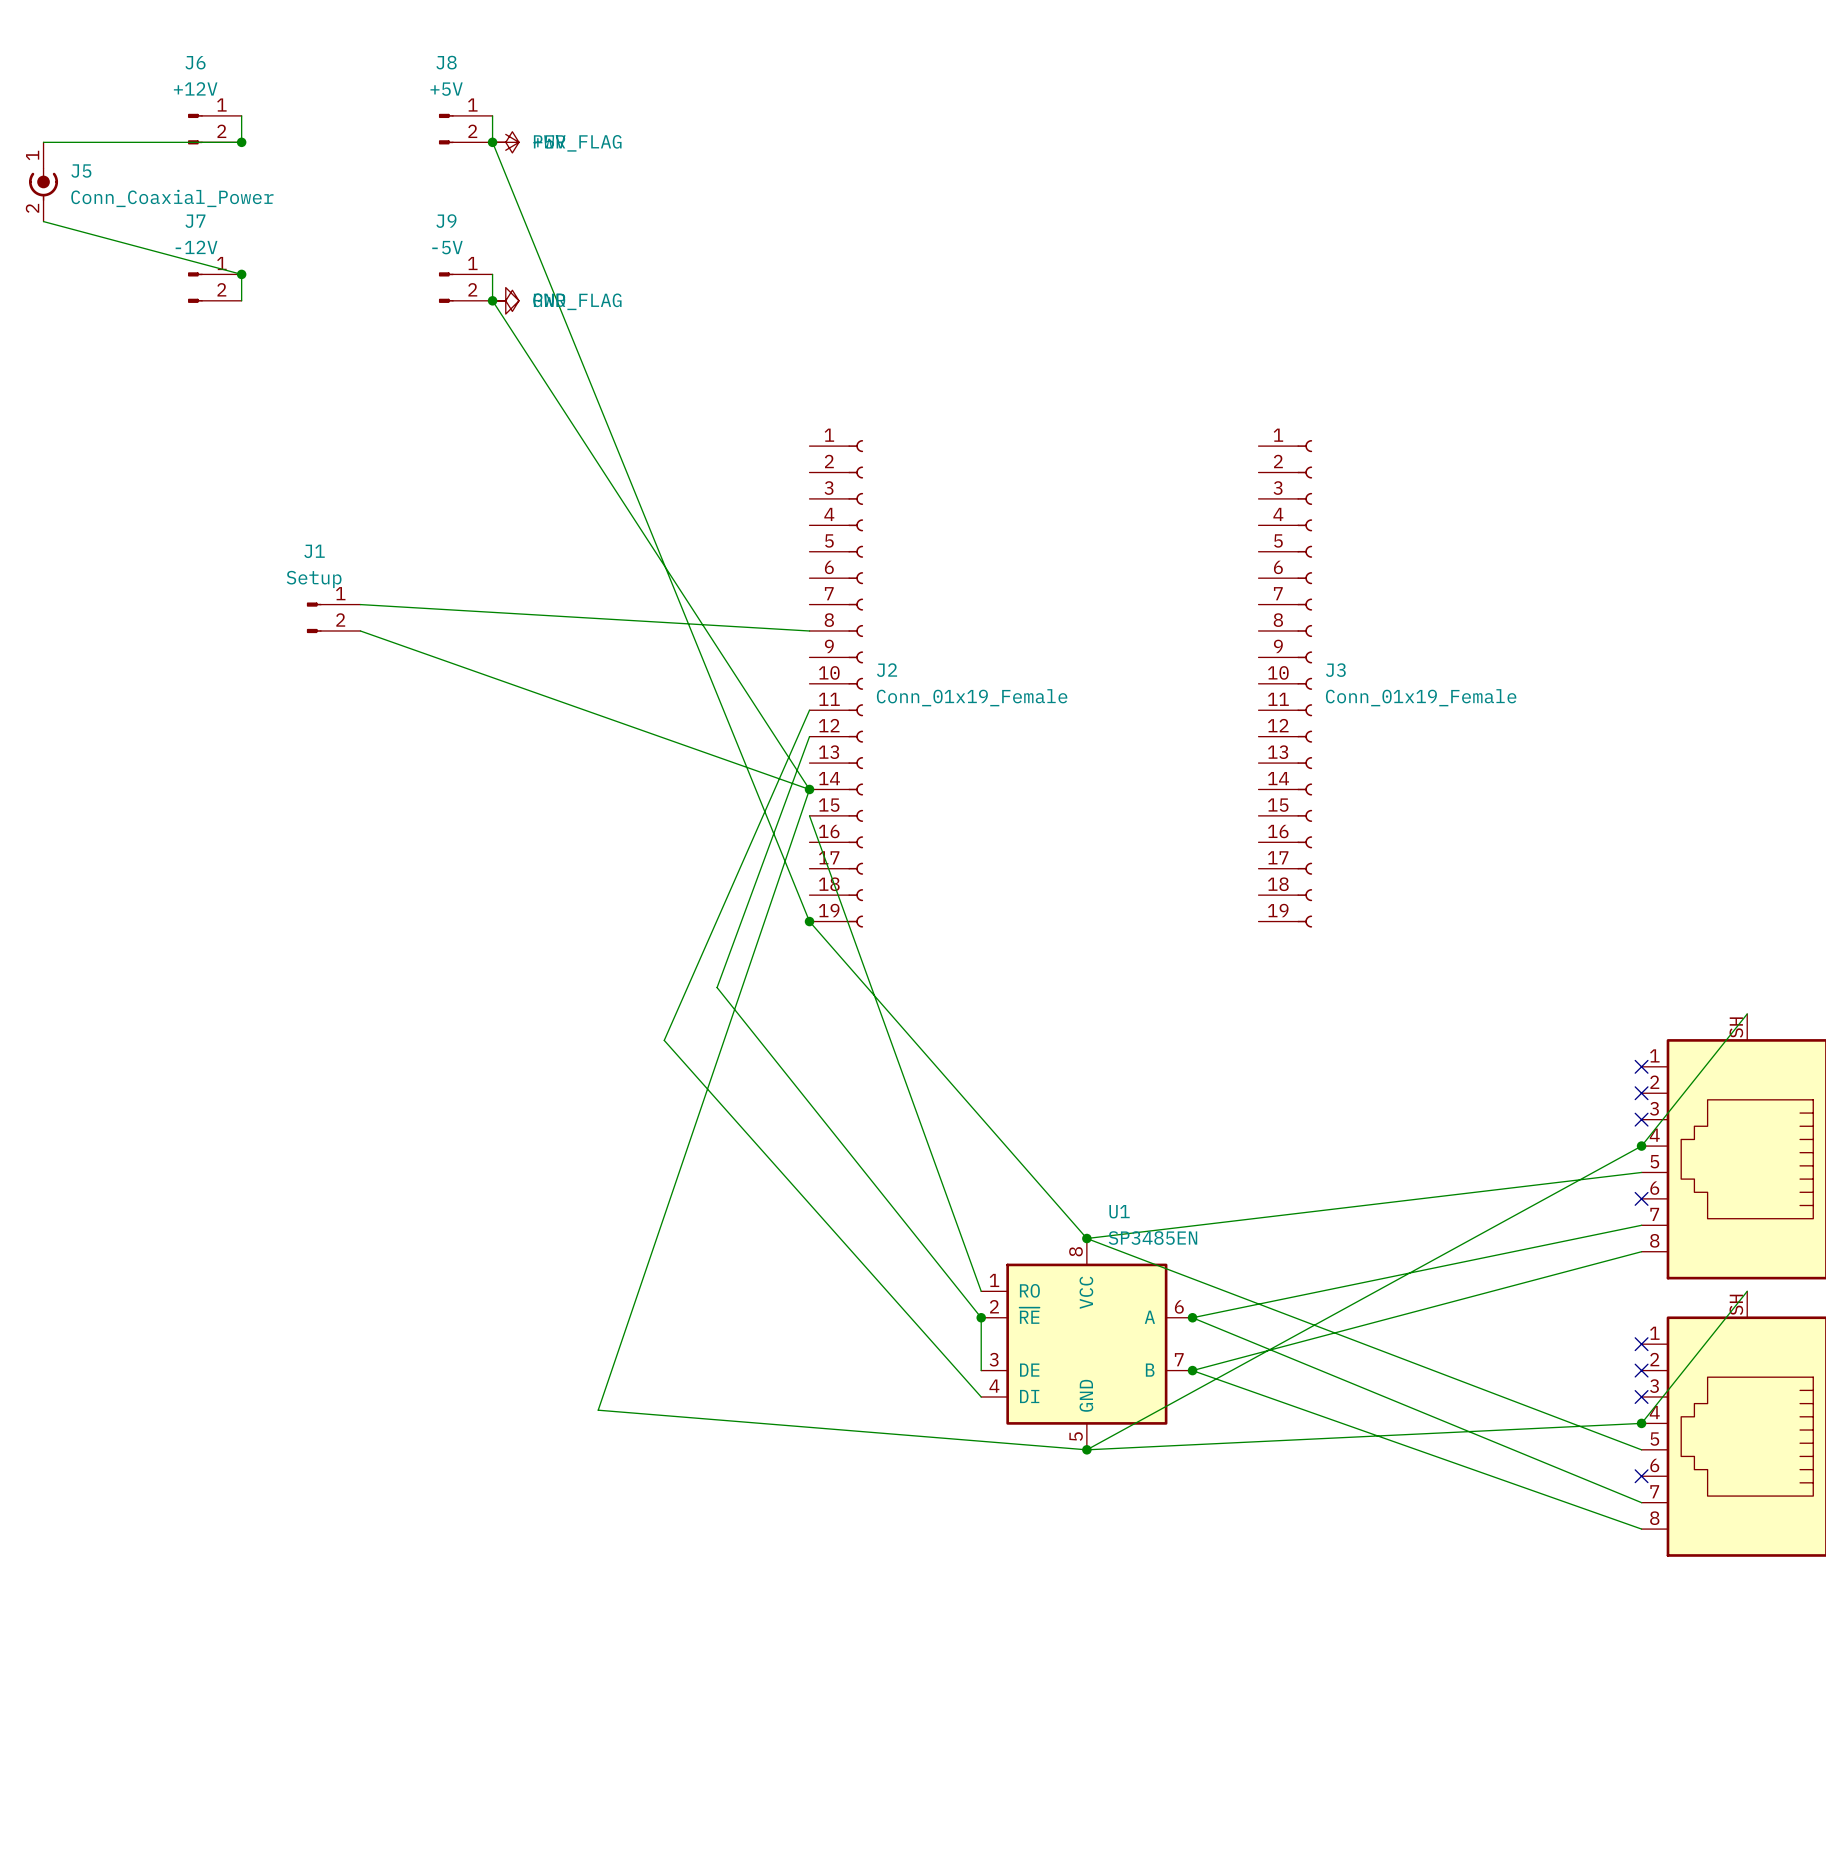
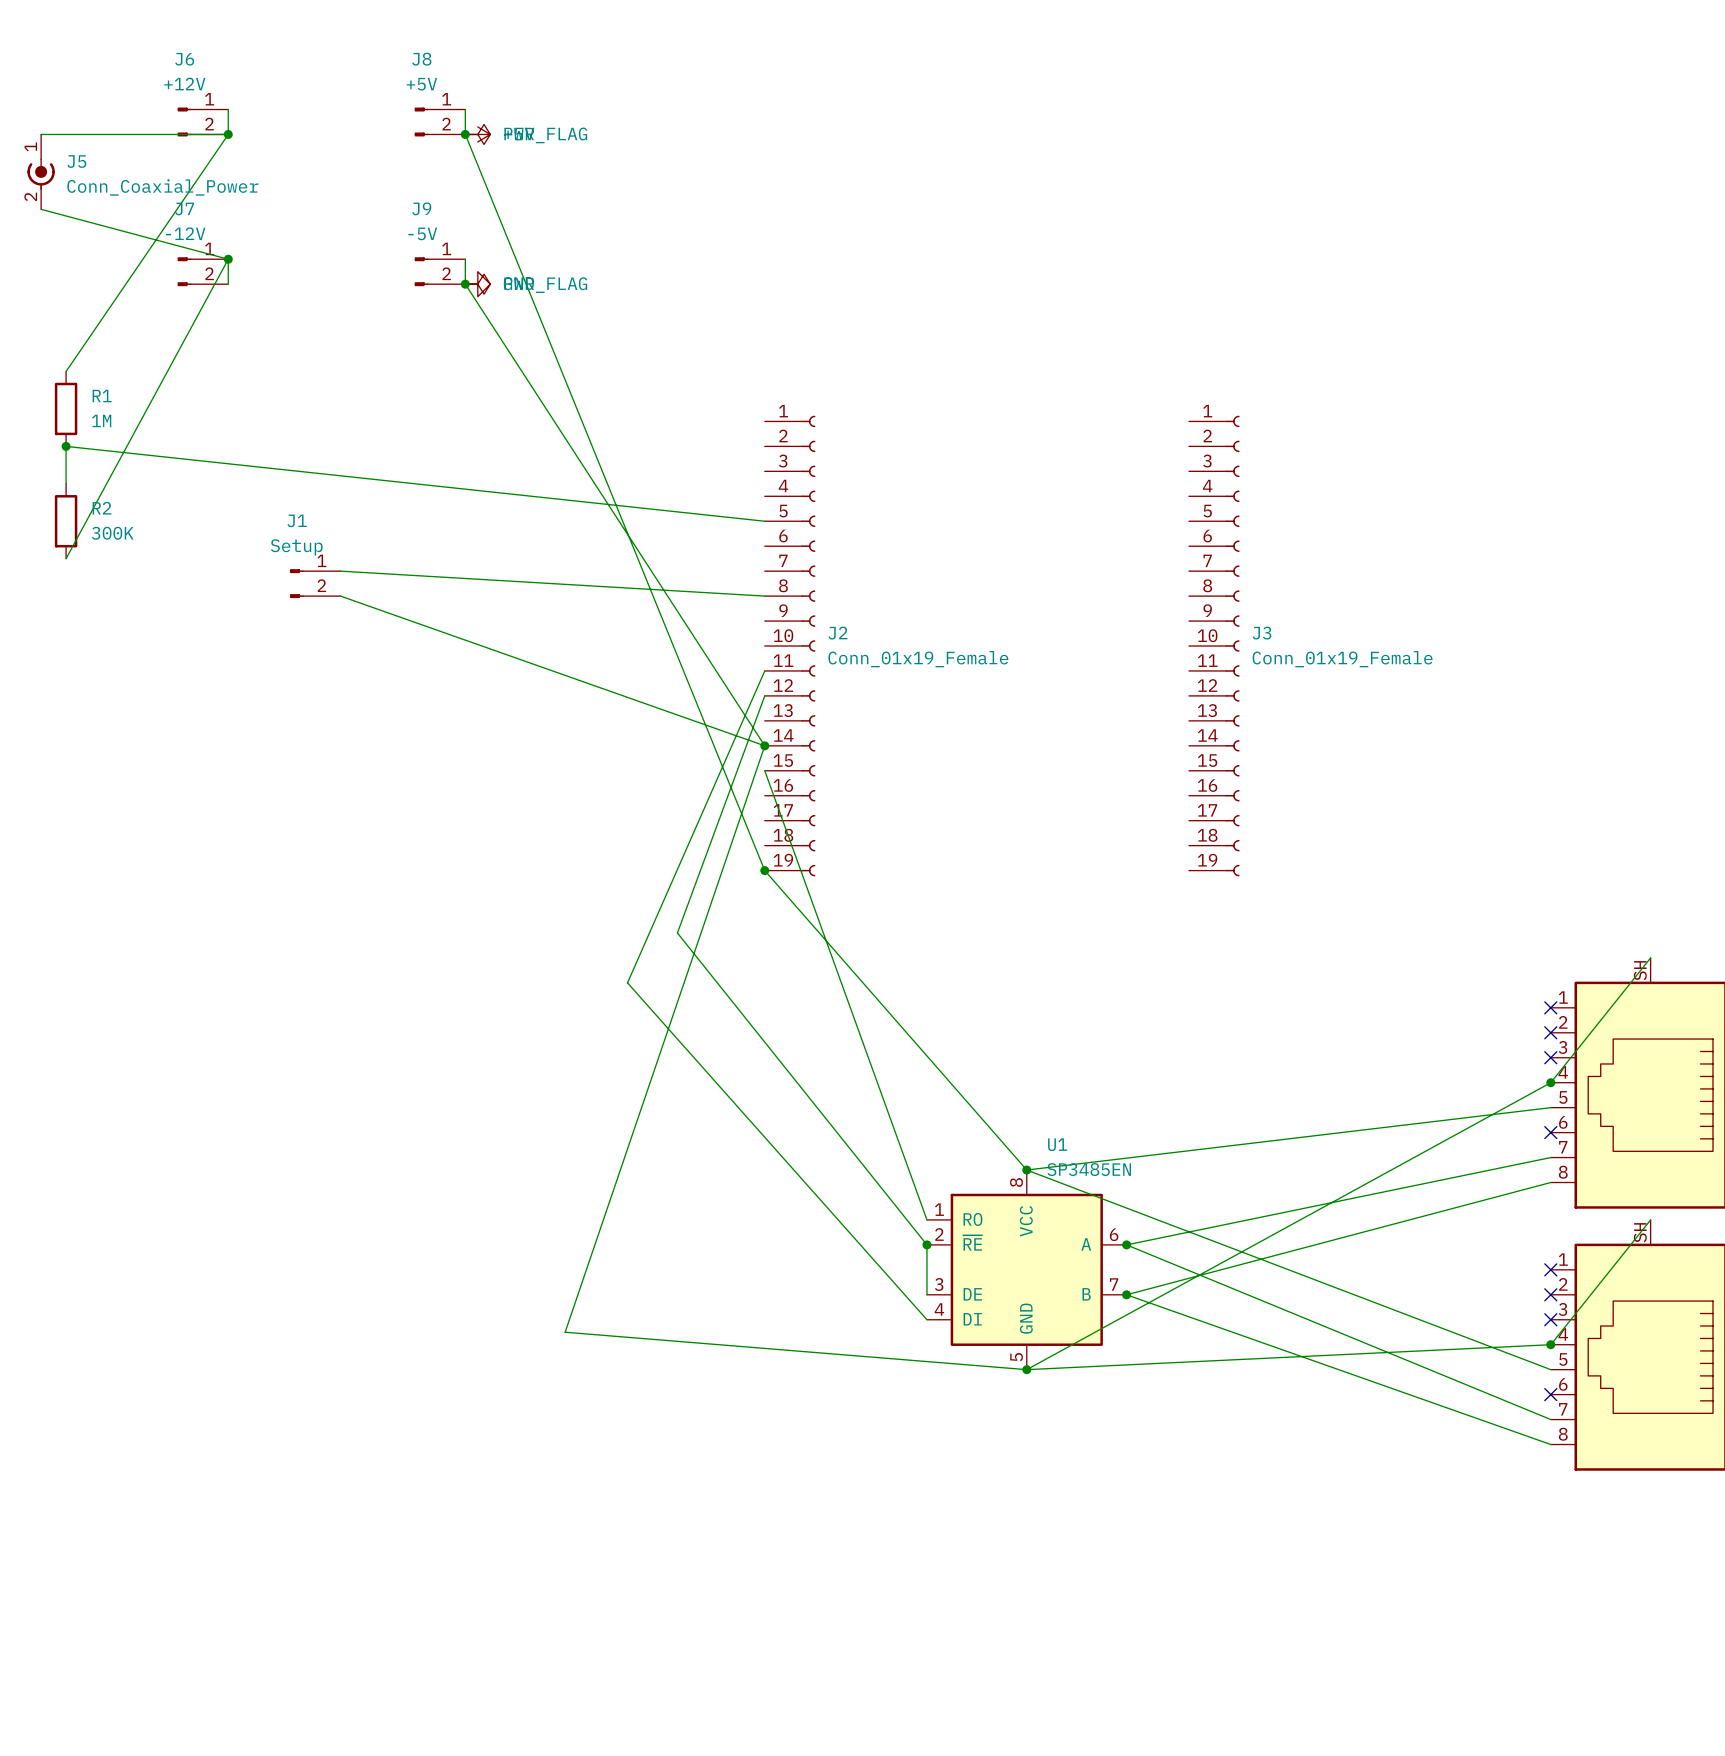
wire: none -> (228, 134) (66, 371)
wire: none -> (228, 259) (66, 558)
R1: none -> 1M (66, 408)
junction: none -> (66, 446)
wire: none -> (66, 483) (66, 446) (764, 521)
R2: none -> 300K (66, 521)

